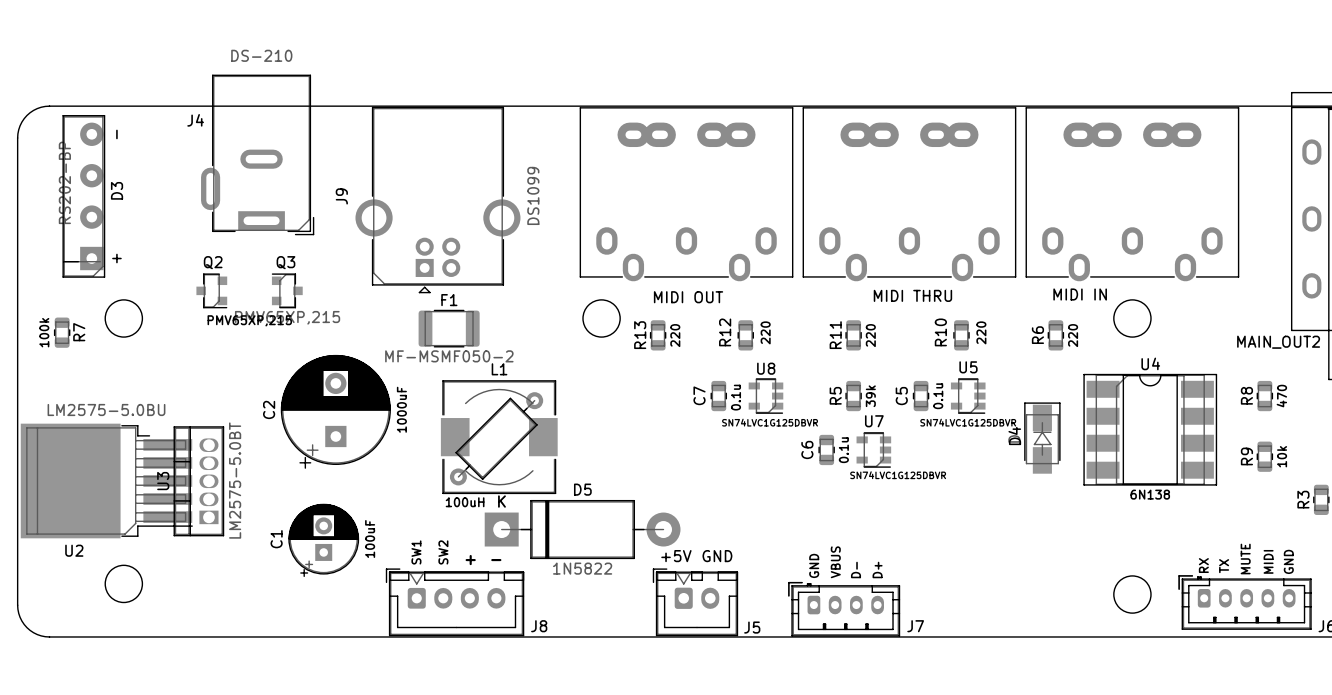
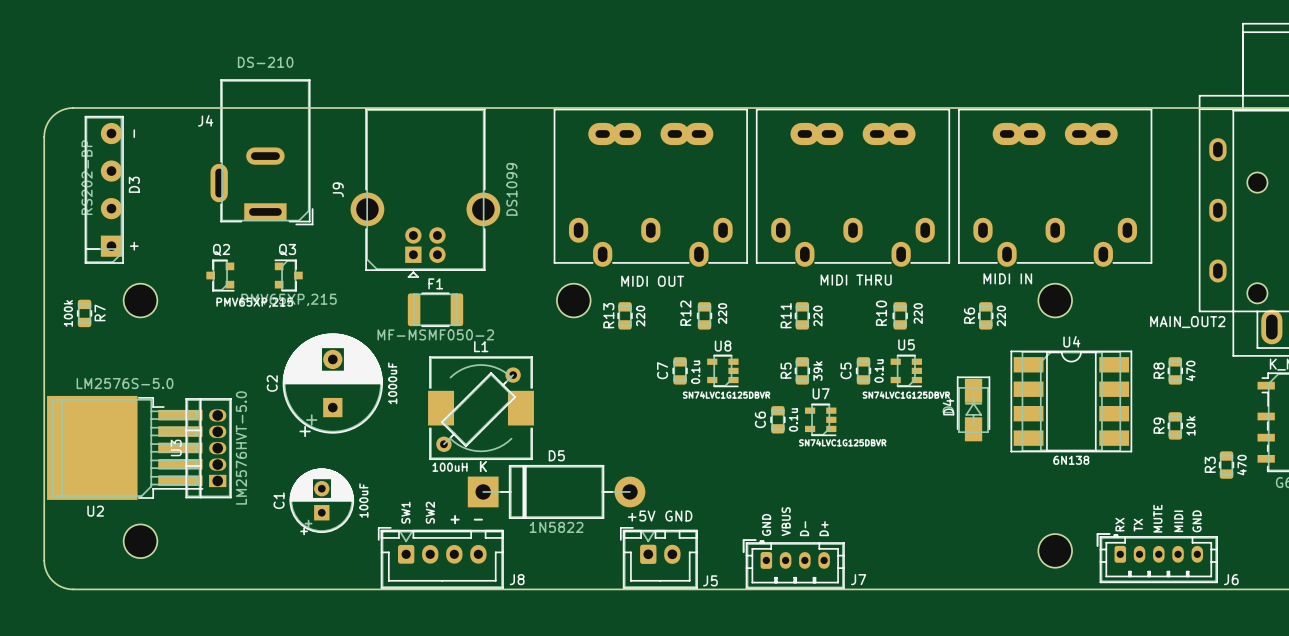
U2 value: LM2575-5.0BU (106, 409) -> LM2576S-5.0 (125, 383)
U3 value: LM2575-5.0BT (235, 480) -> LM2576HVT-5.0 (241, 447)

